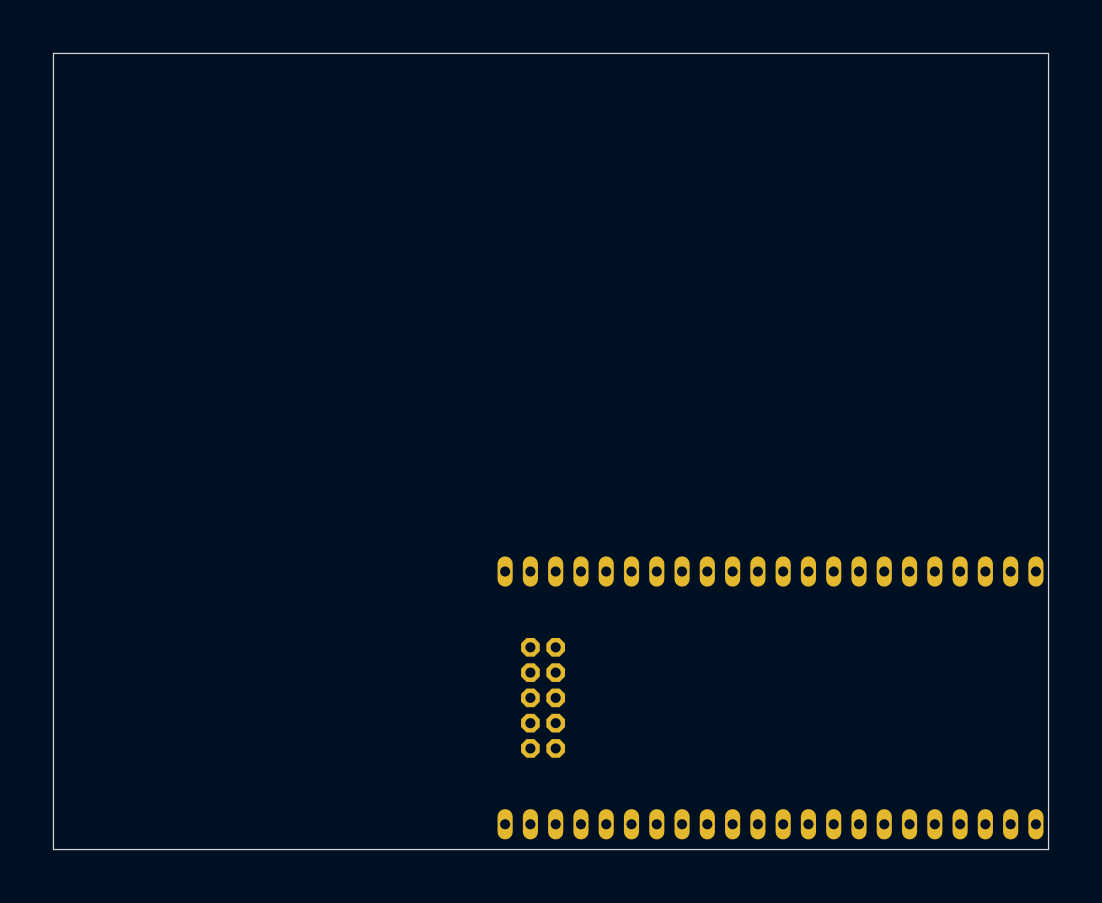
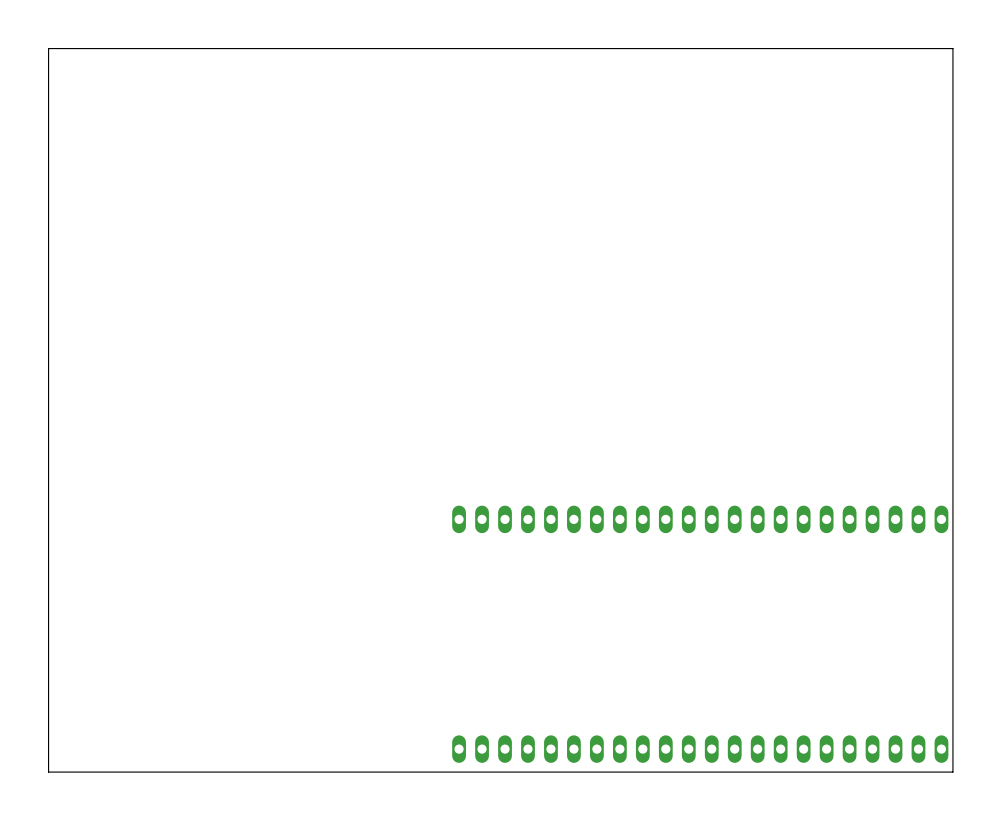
part: (543, 697) -> none

